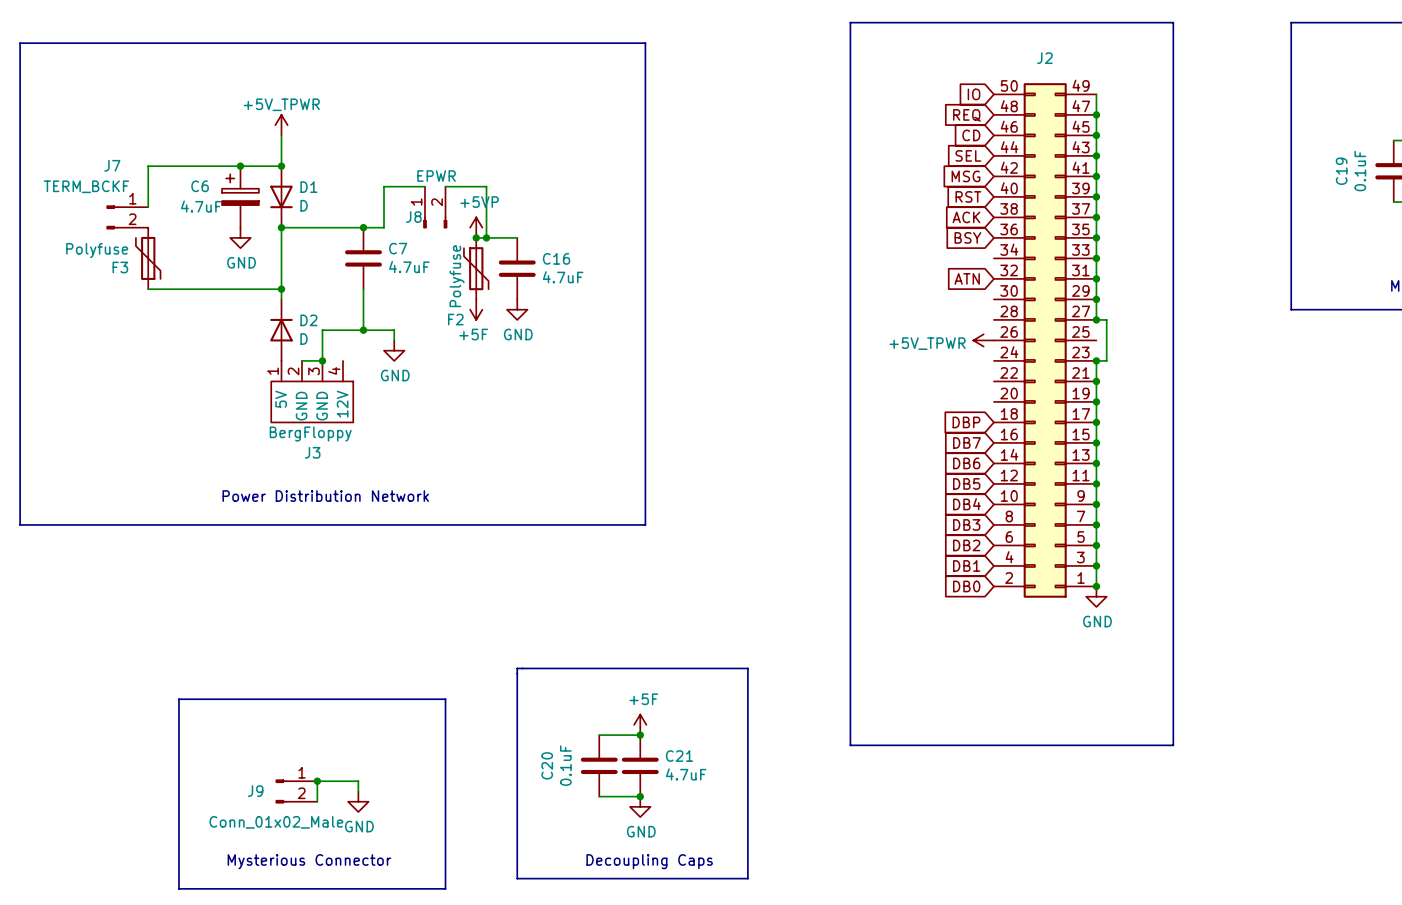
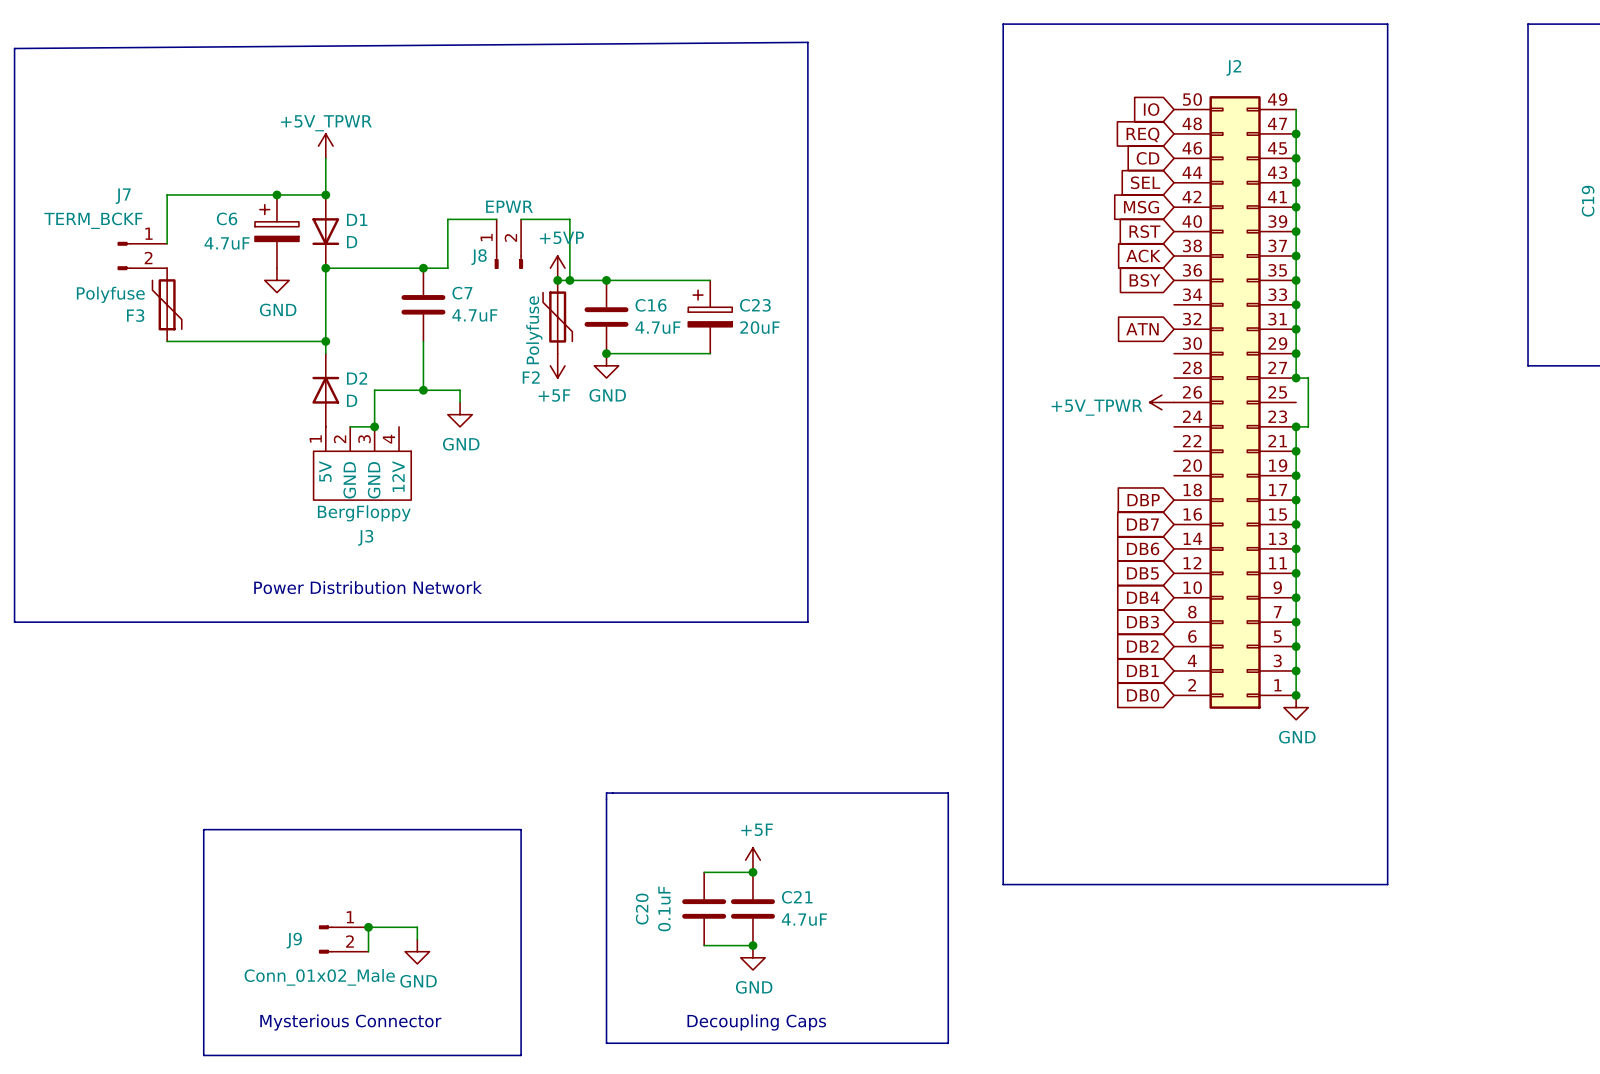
line: (20, 43) (645, 43) (645, 524) -> (14, 48) (807, 42) (807, 622) (759, 622)
wire: none -> (606, 280) (710, 280)
junction: none -> (606, 280)
C23: none -> 20uF (710, 317)
wire: none -> (606, 353) (710, 353)
junction: none -> (606, 353)
line: (747, 668) (747, 878) -> (881, 793) (948, 793) (948, 1043) (881, 1043)

